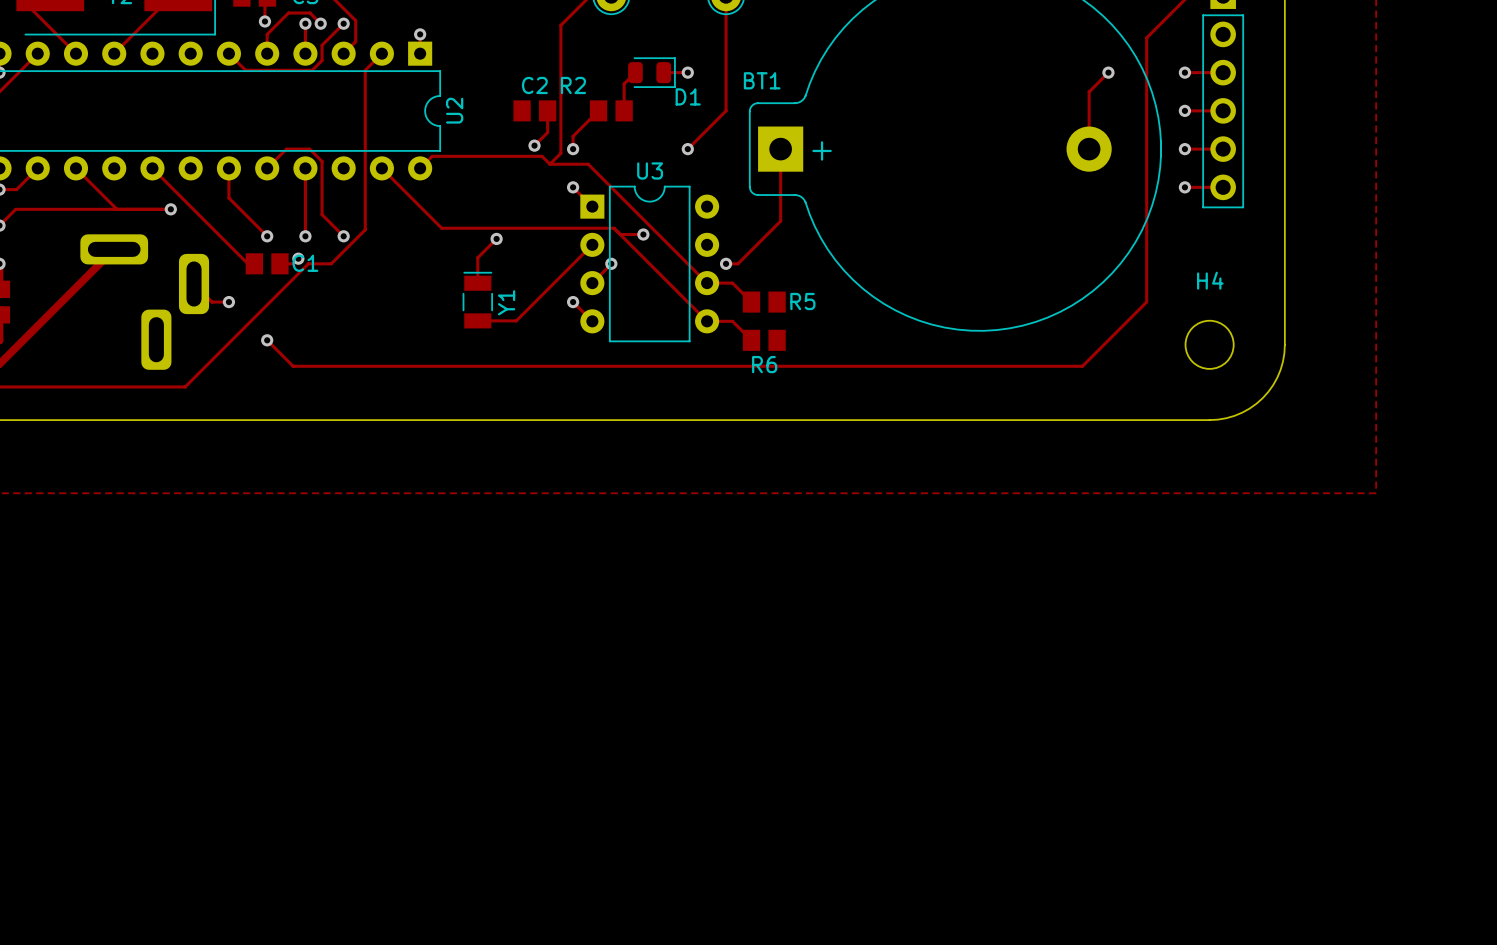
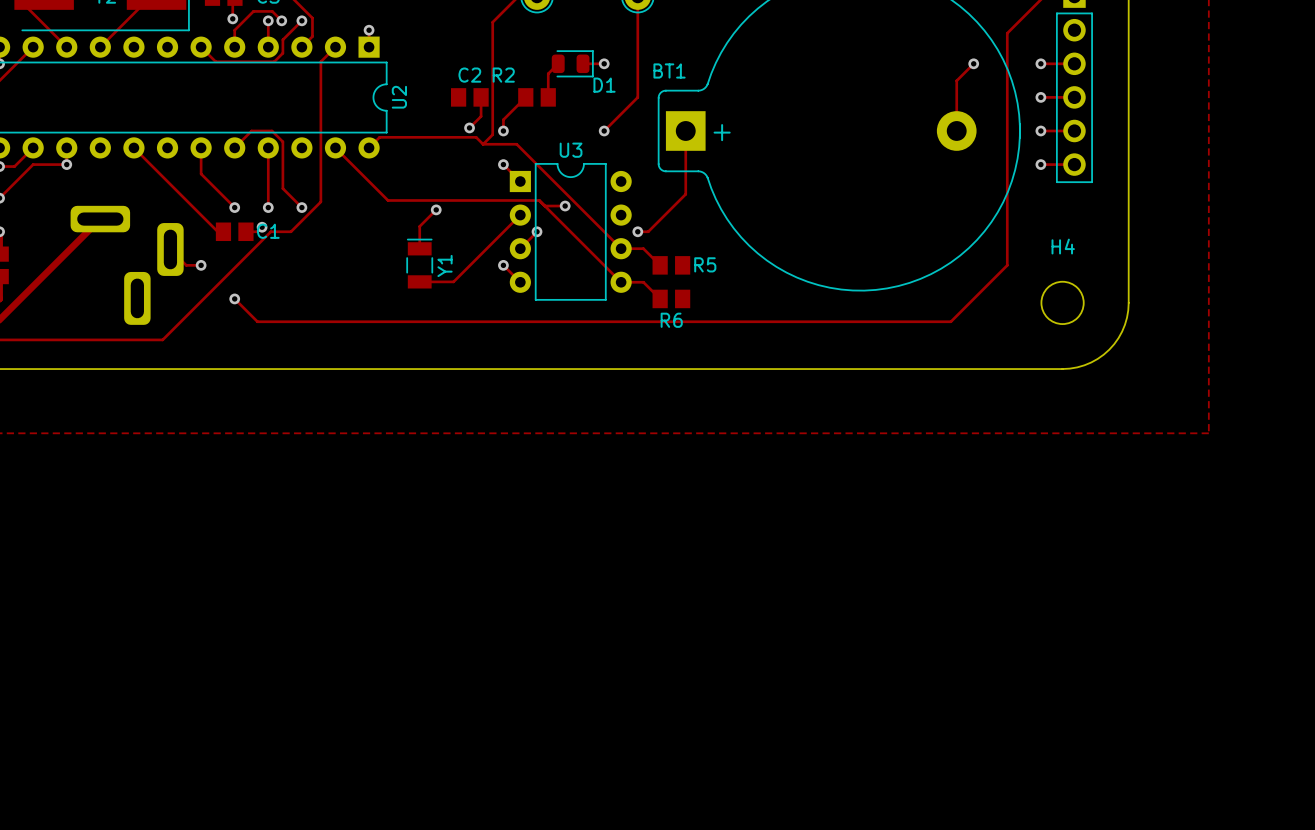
track: (75, 168) (116, 209) -> (66, 147) (66, 164) (33, 164) (13, 183)
via: none -> (66, 164)
track: (15, 209) (170, 209) -> none
via: (170, 209) -> none

